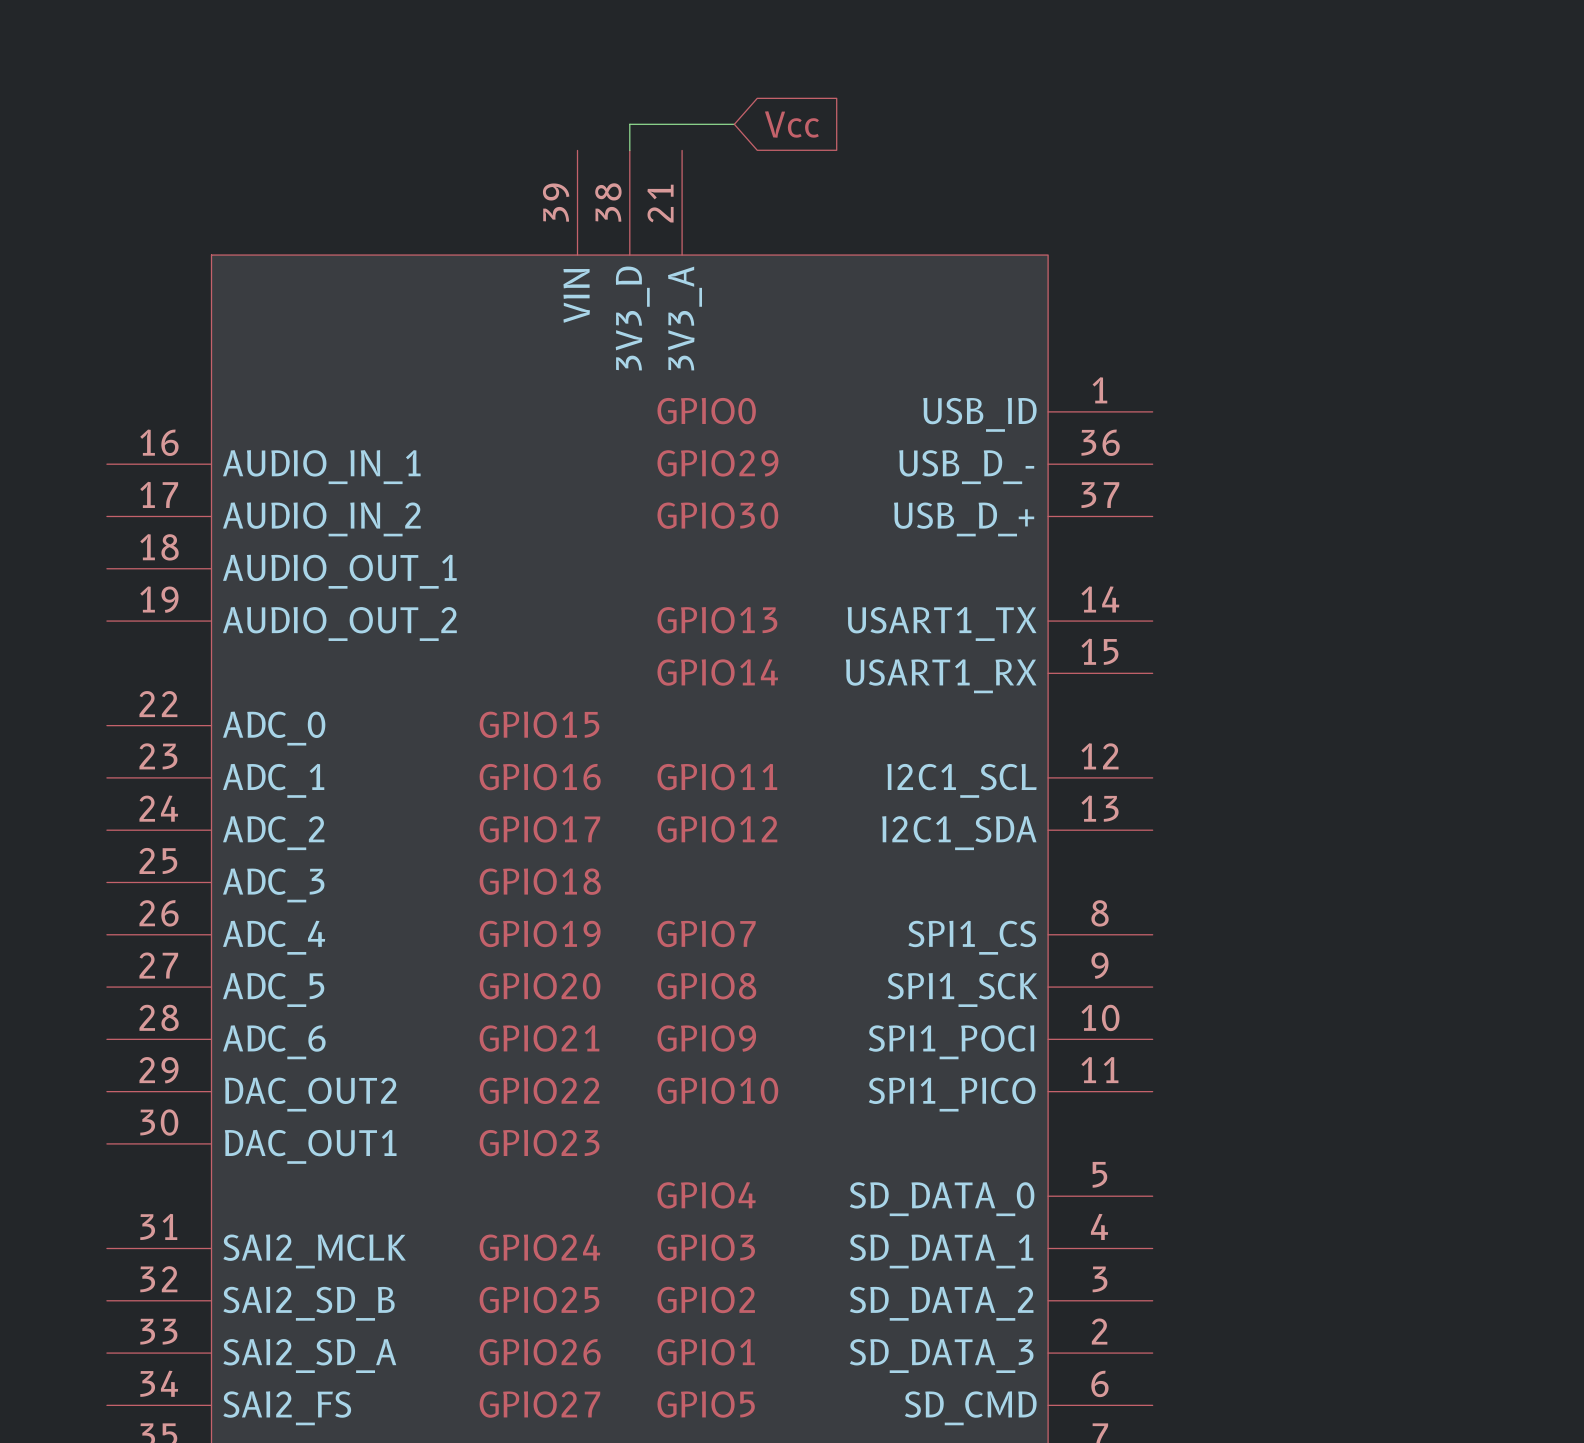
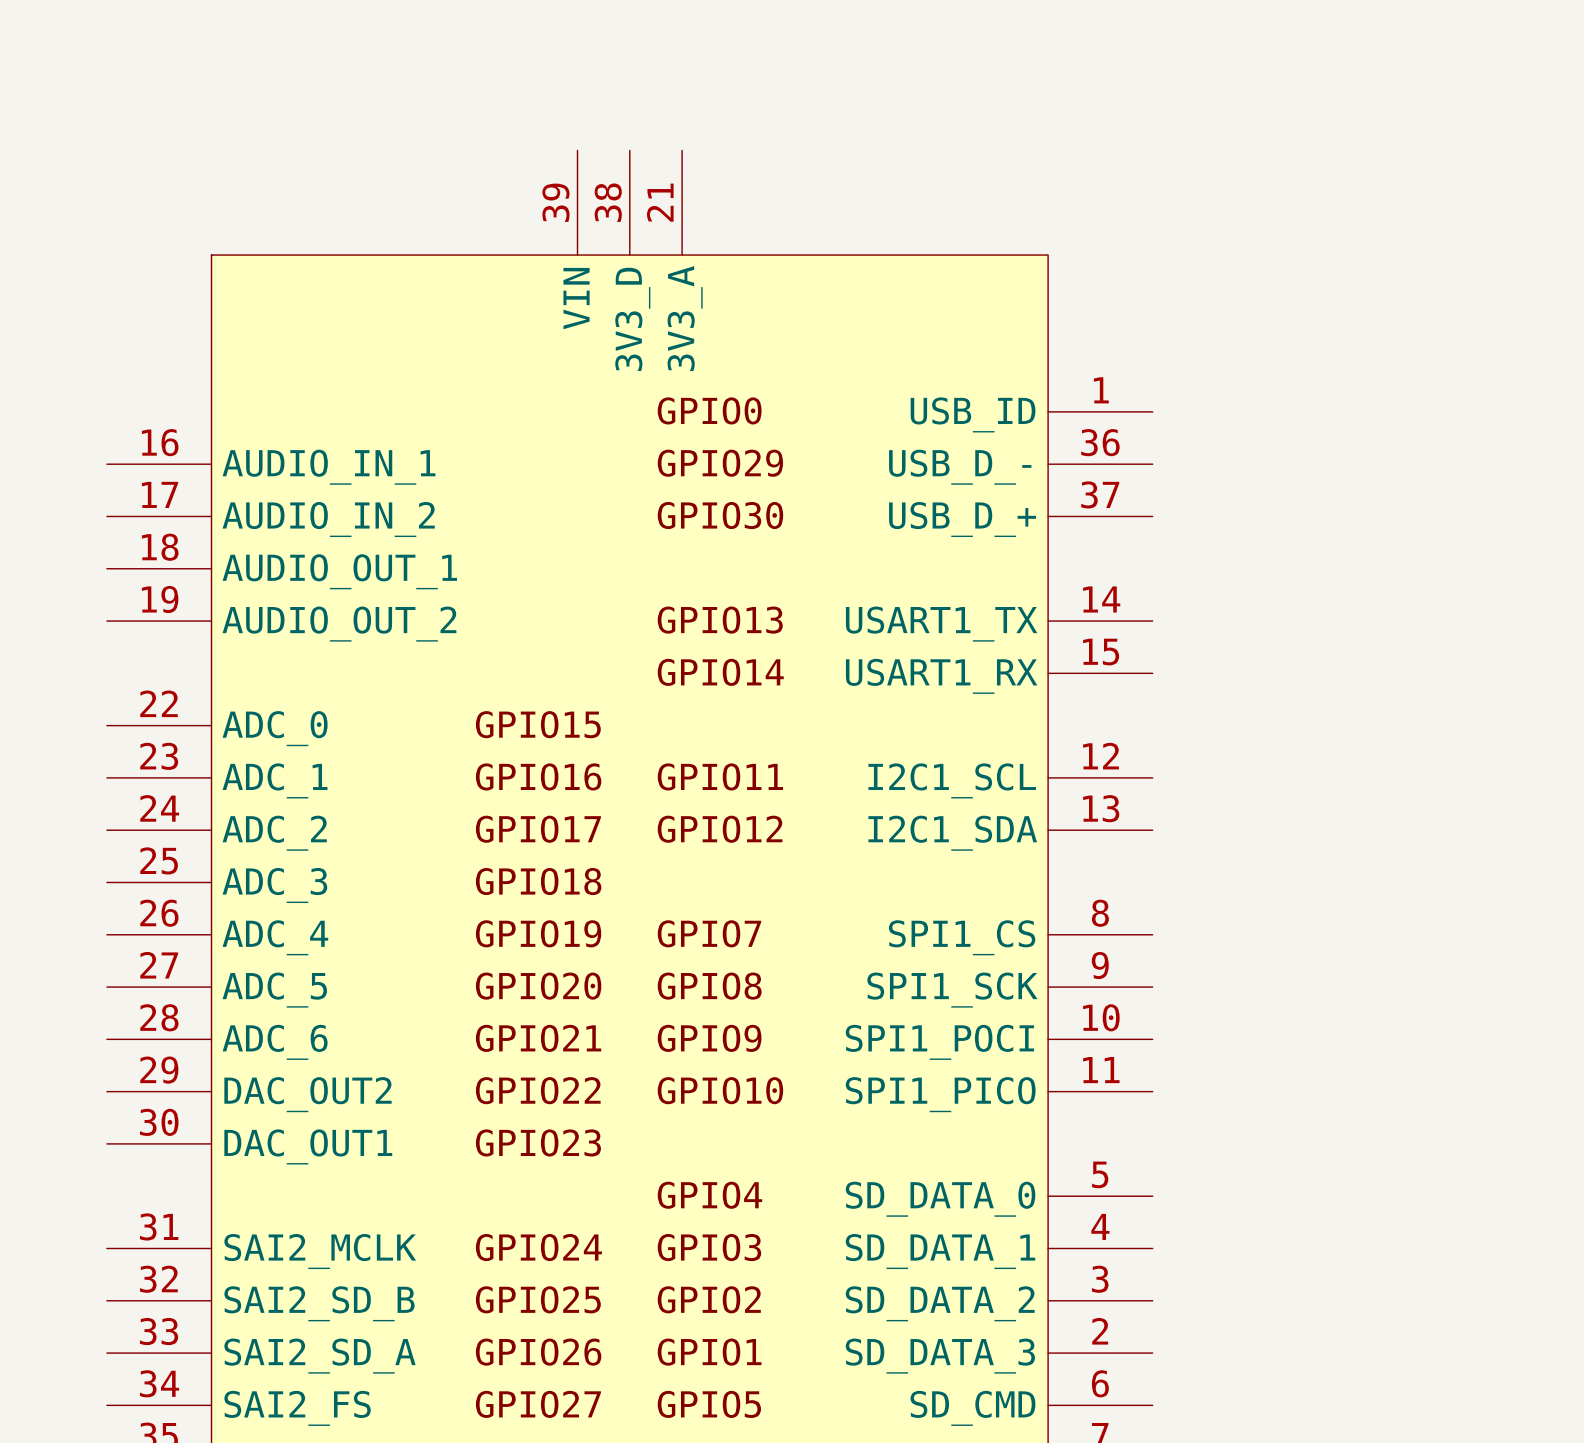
wire: (734, 124) (629, 124) (629, 150) -> none
global label: Vcc (791, 124) -> none

